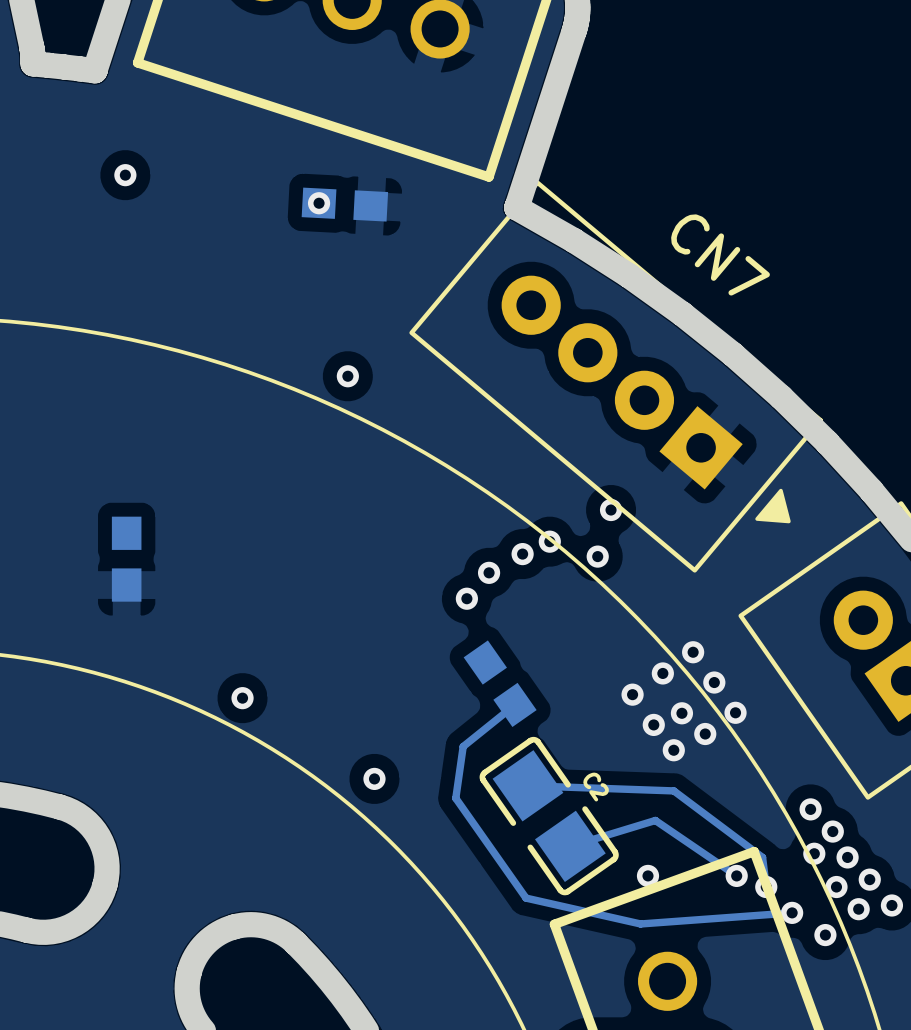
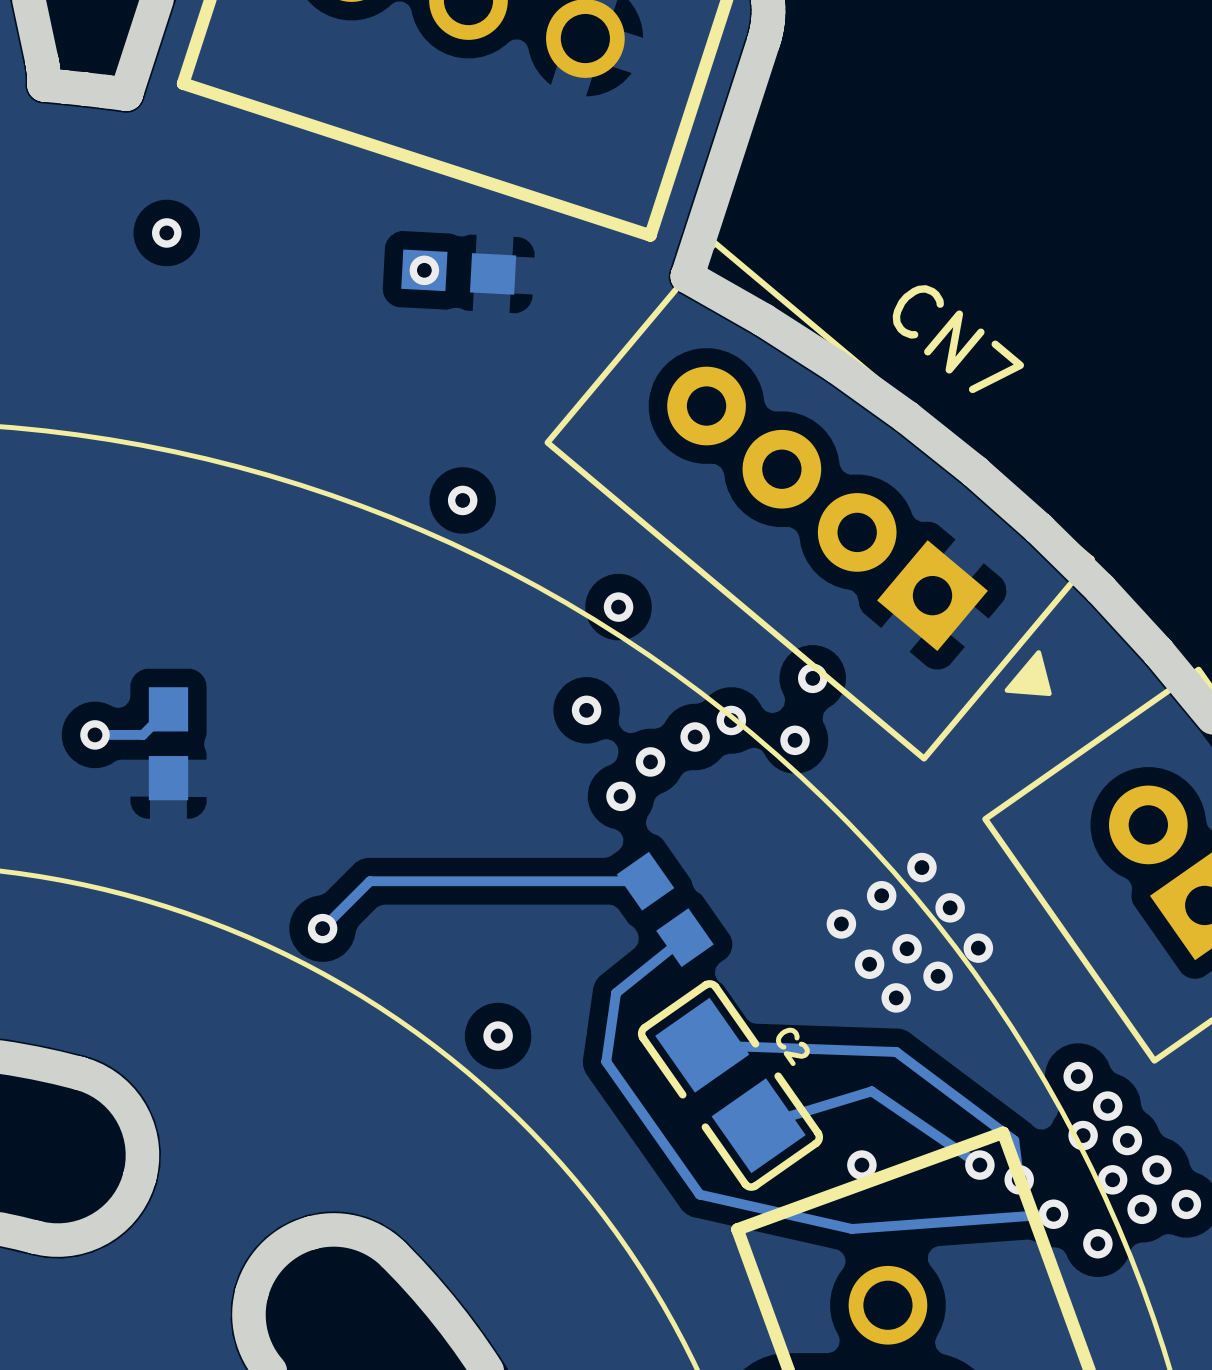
via: none -> (618, 607)
track: none -> (168, 709) (142, 734) (94, 734)
via: none -> (586, 710)
via: none -> (94, 734)
track: none -> (645, 881) (369, 881) (322, 928)

